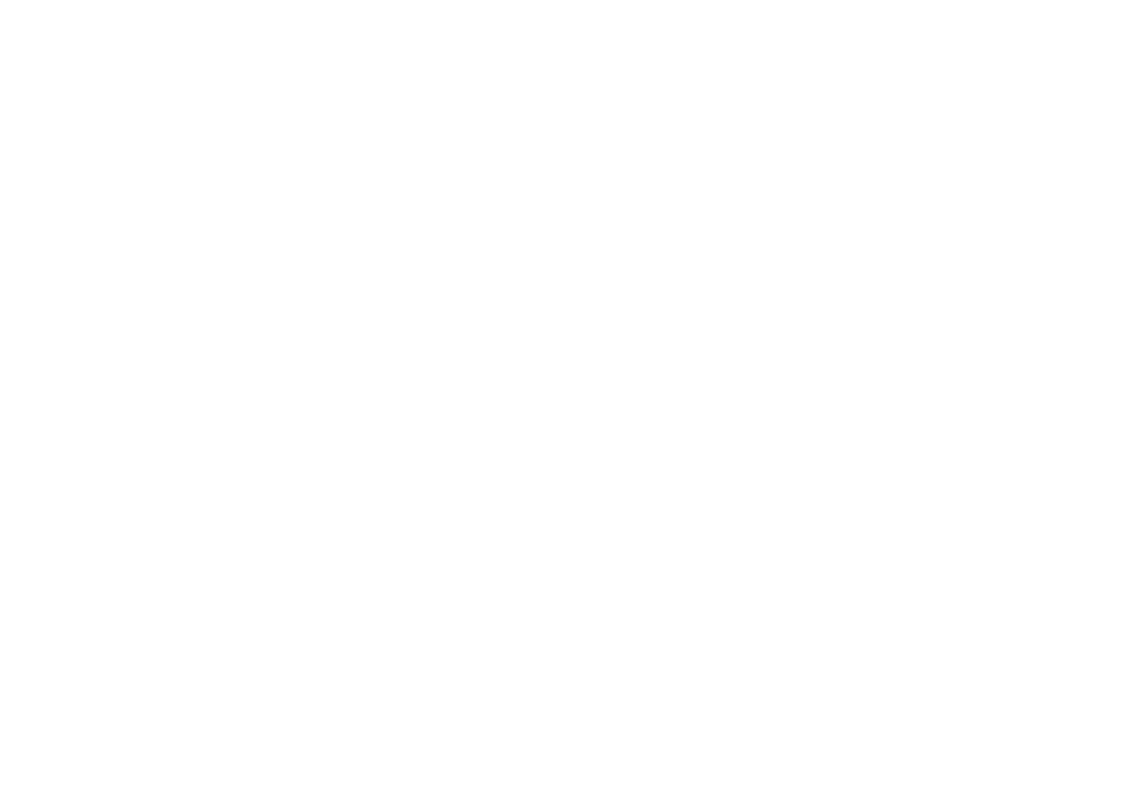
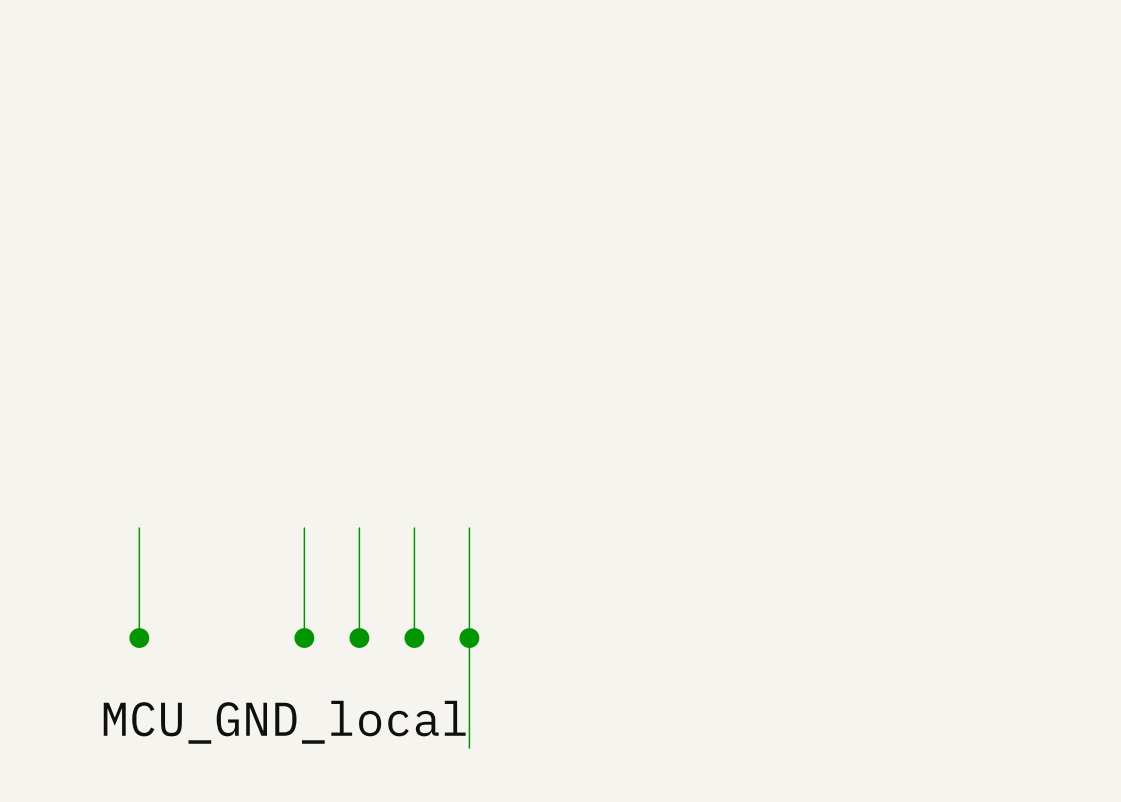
wire: none -> (139, 528) (139, 638)
wire: none -> (304, 528) (304, 638)
wire: none -> (359, 528) (359, 638)
wire: none -> (414, 528) (414, 638)
wire: none -> (469, 528) (469, 748)
junction: none -> (139, 638)
junction: none -> (304, 638)
junction: none -> (359, 638)
junction: none -> (414, 638)
junction: none -> (469, 638)
label: none -> MCU_GND_local (284, 722)

